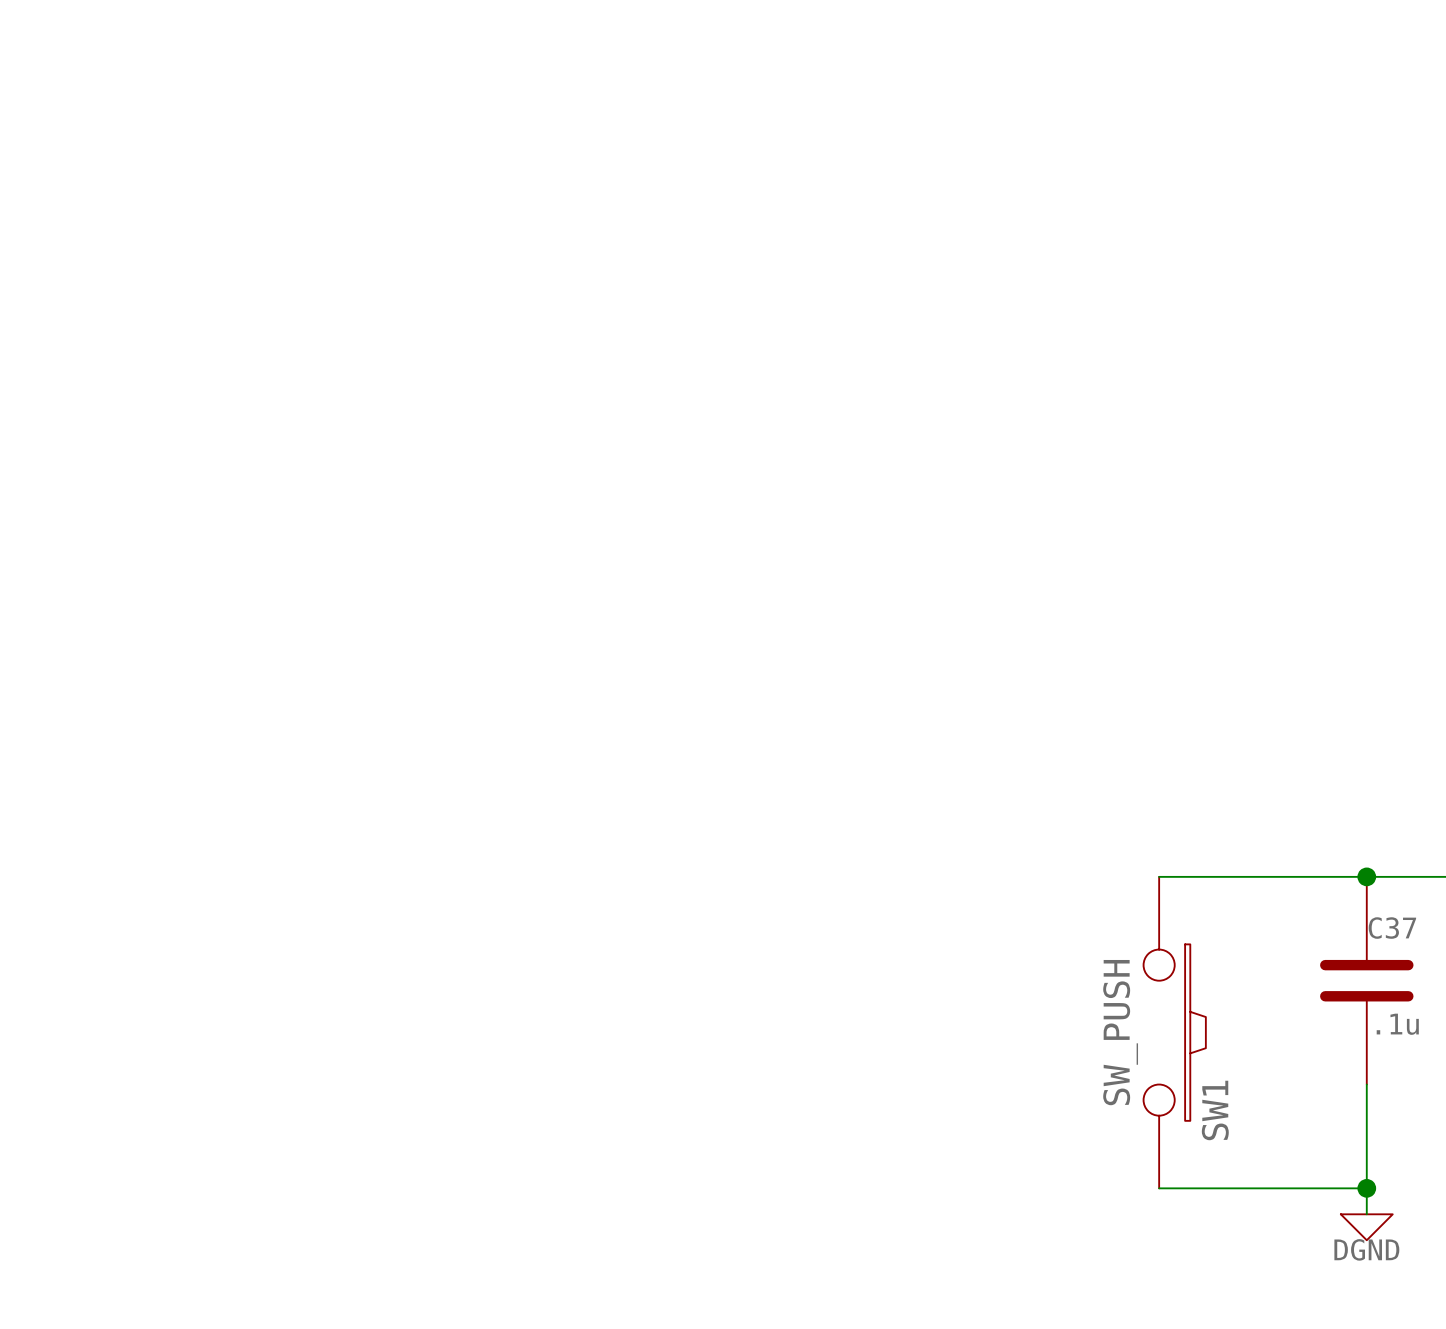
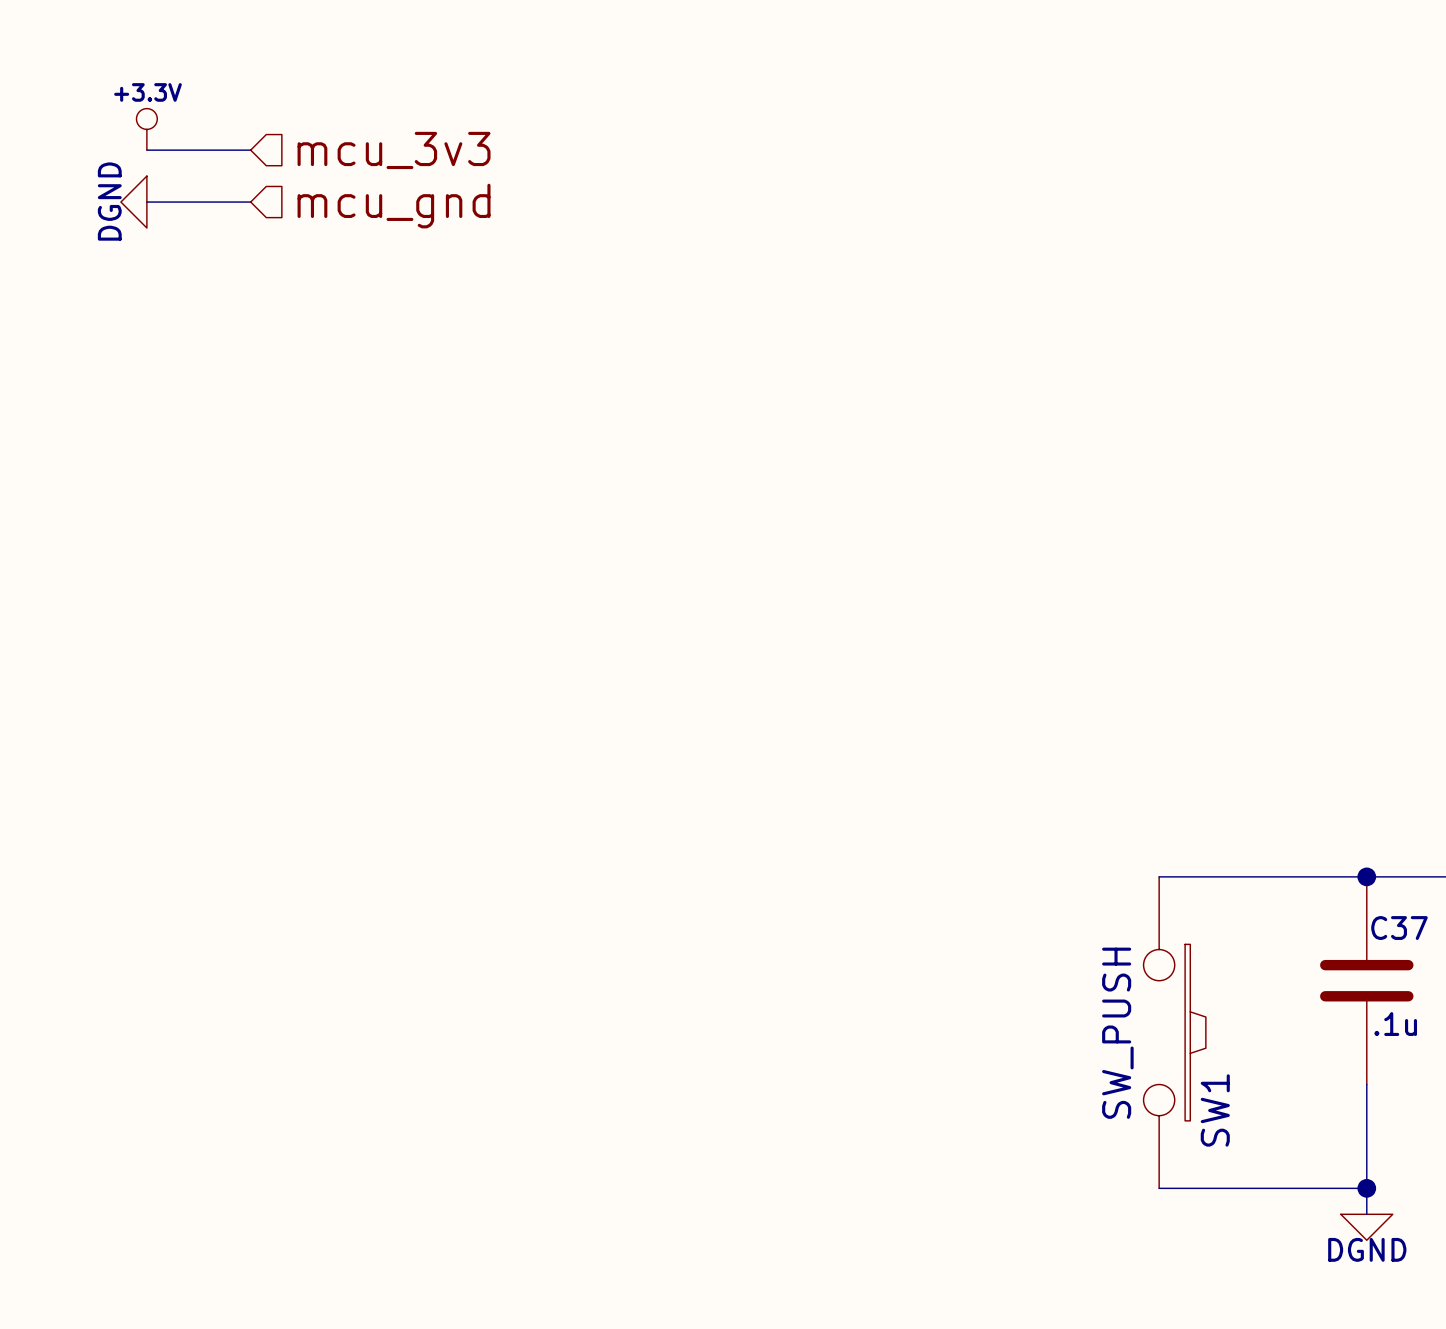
power symbol: none -> +3.3V (146, 129)
wire: none -> (146, 150) (250, 150)
hierarchical label: none -> mcu_3v3 (394, 150)
power symbol: none -> DGND (133, 202)
wire: none -> (146, 202) (250, 202)
hierarchical label: none -> mcu_gnd (394, 206)

